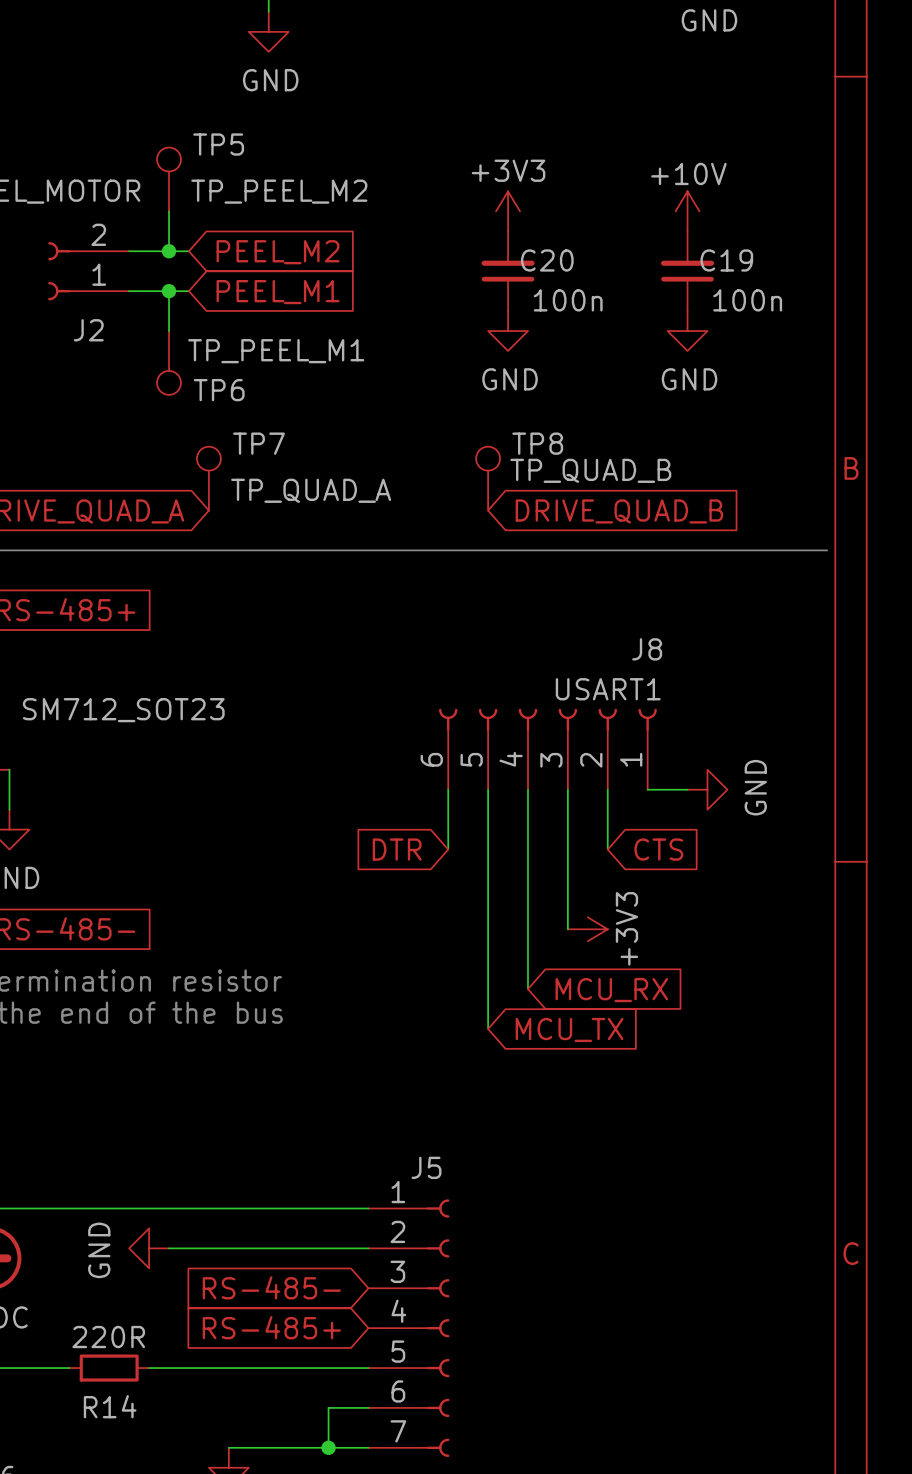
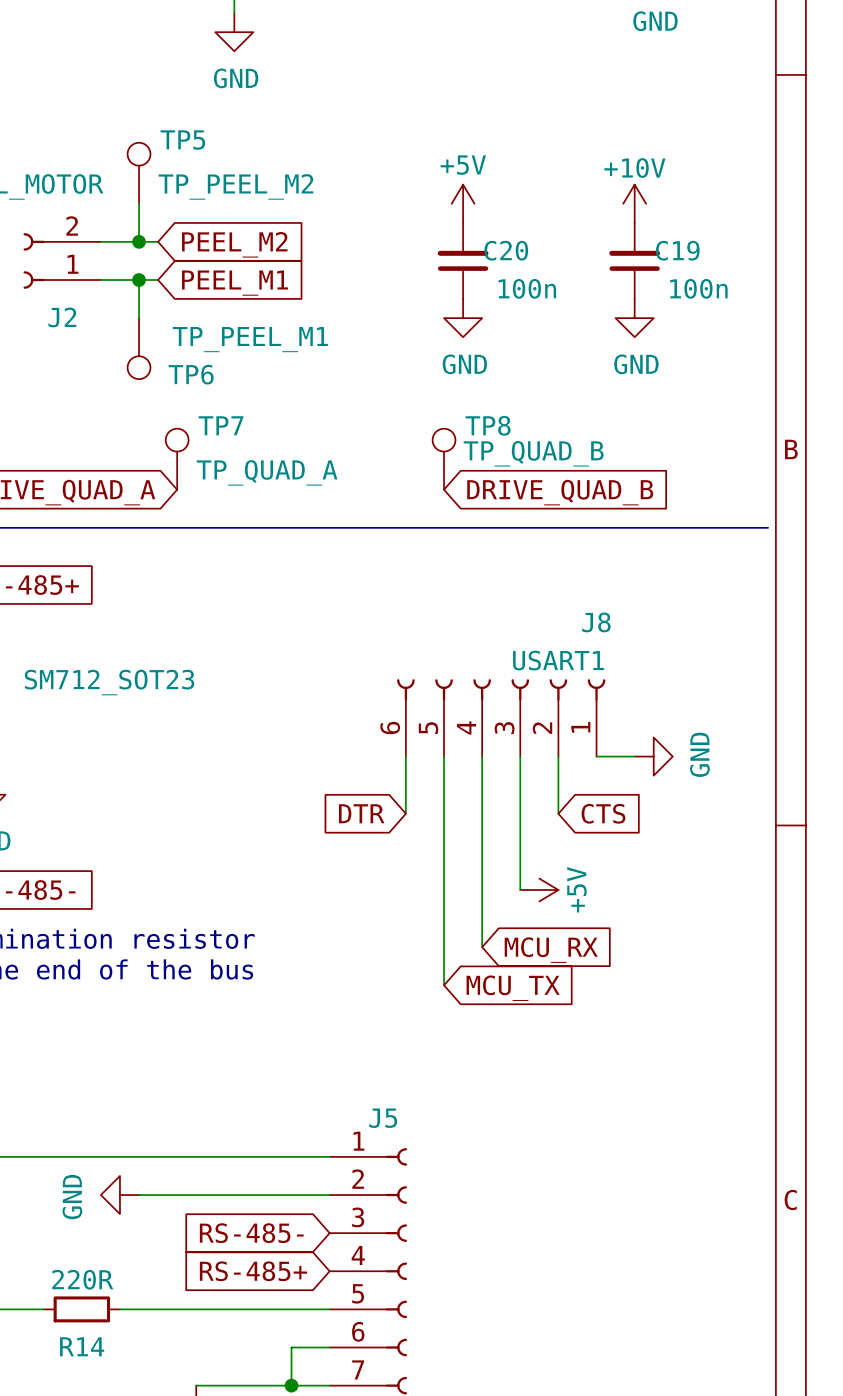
power symbol: +3V3 (508, 211) -> +5V (463, 203)
power symbol: +3V3 (587, 929) -> +5V (539, 890)

